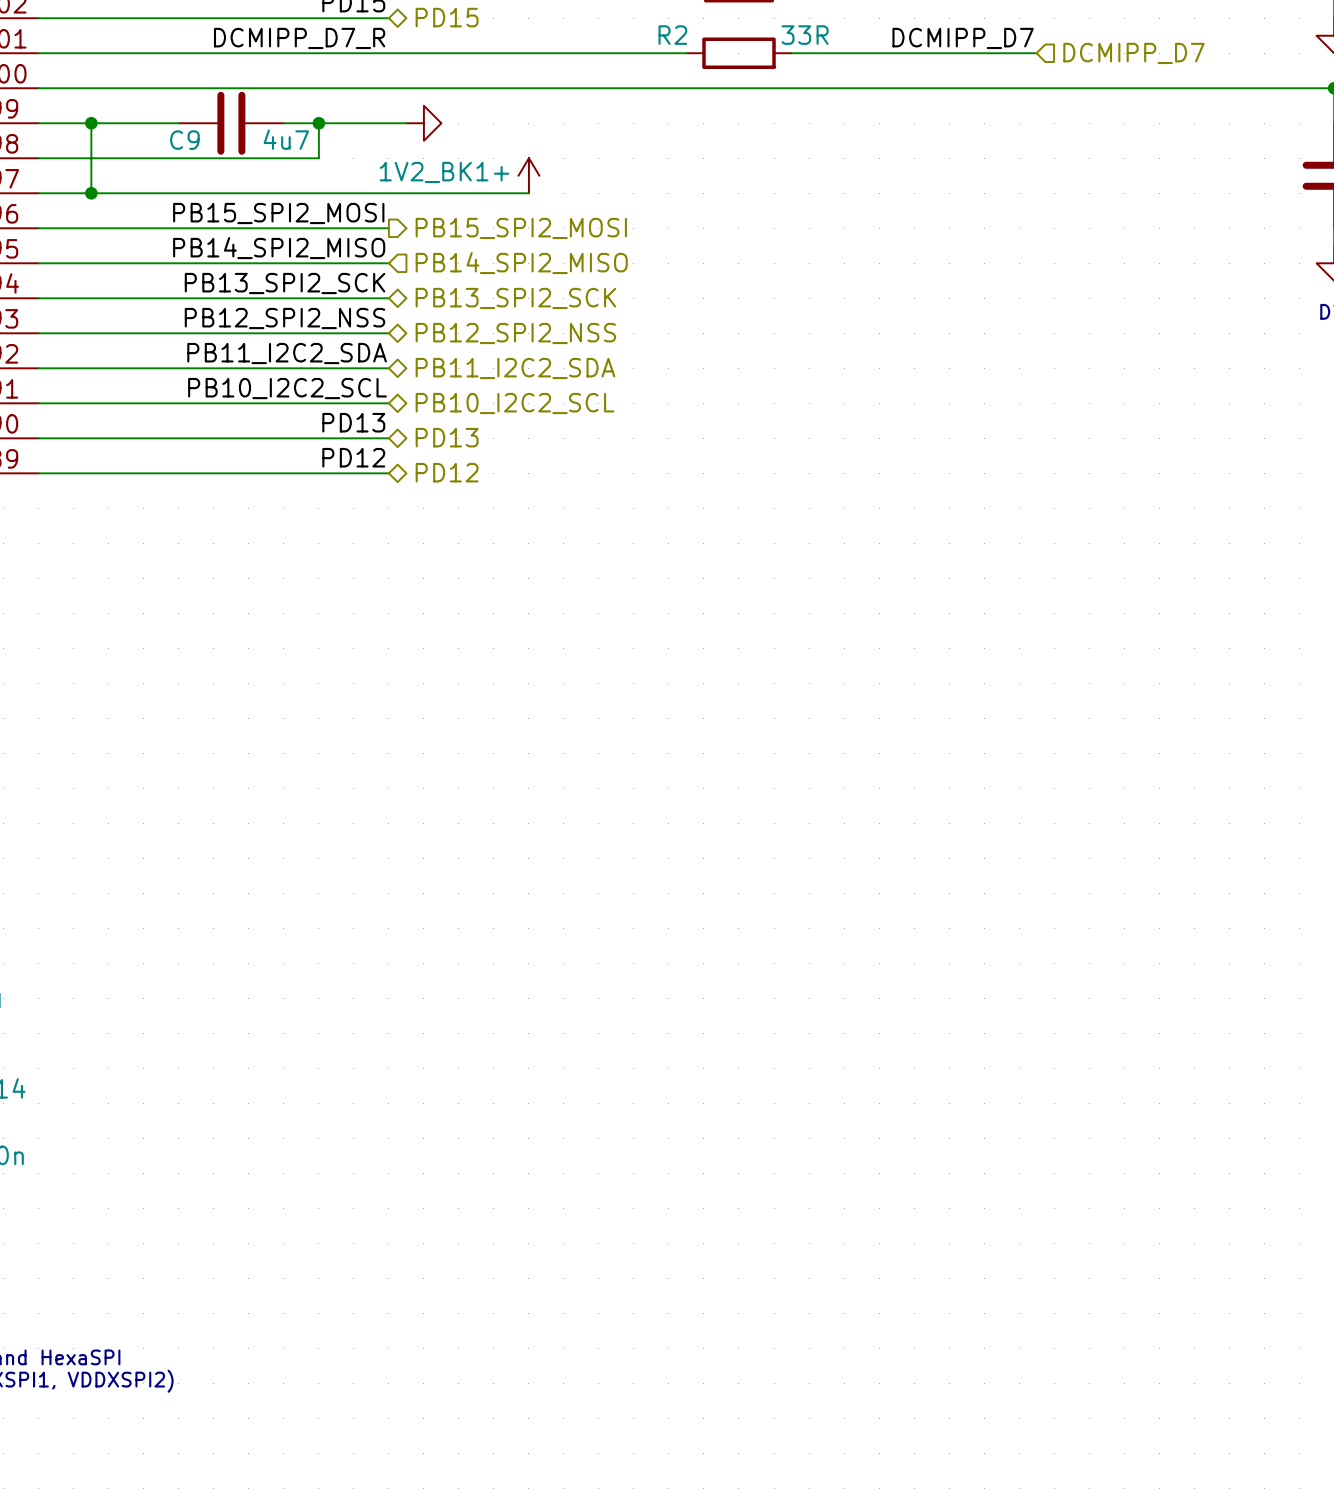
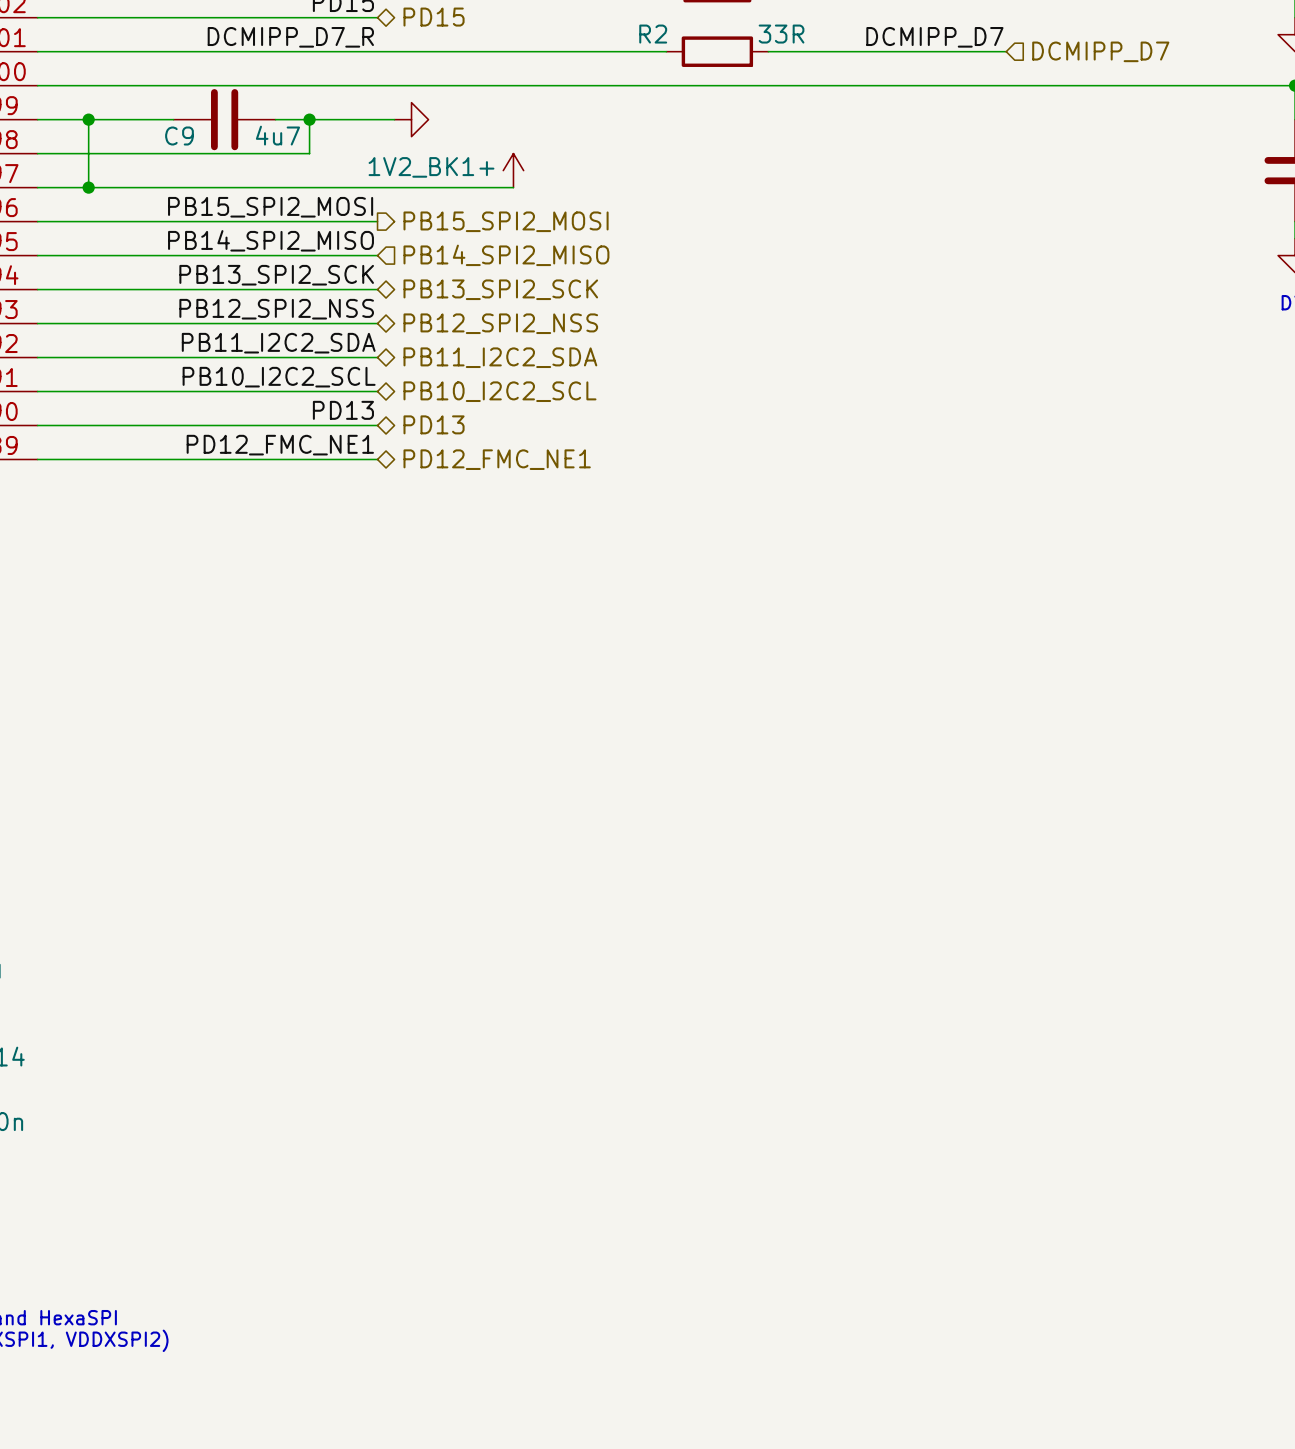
label: PD12 (353, 457) -> PD12_FMC_NE1 (280, 445)
hierarchical label: PD12 (447, 472) -> PD12_FMC_NE1 (497, 459)

